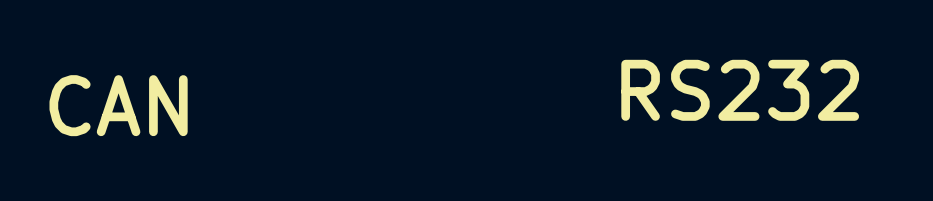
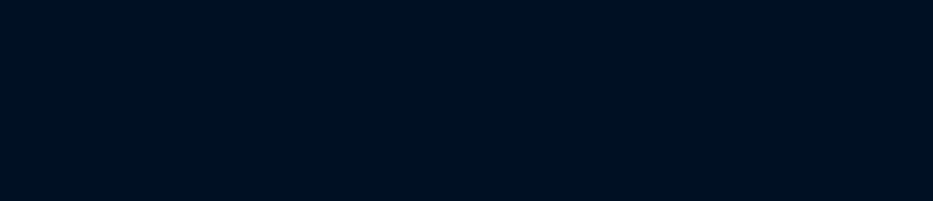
text: RS232 (740, 90) -> none
text: CAN (118, 105) -> none

